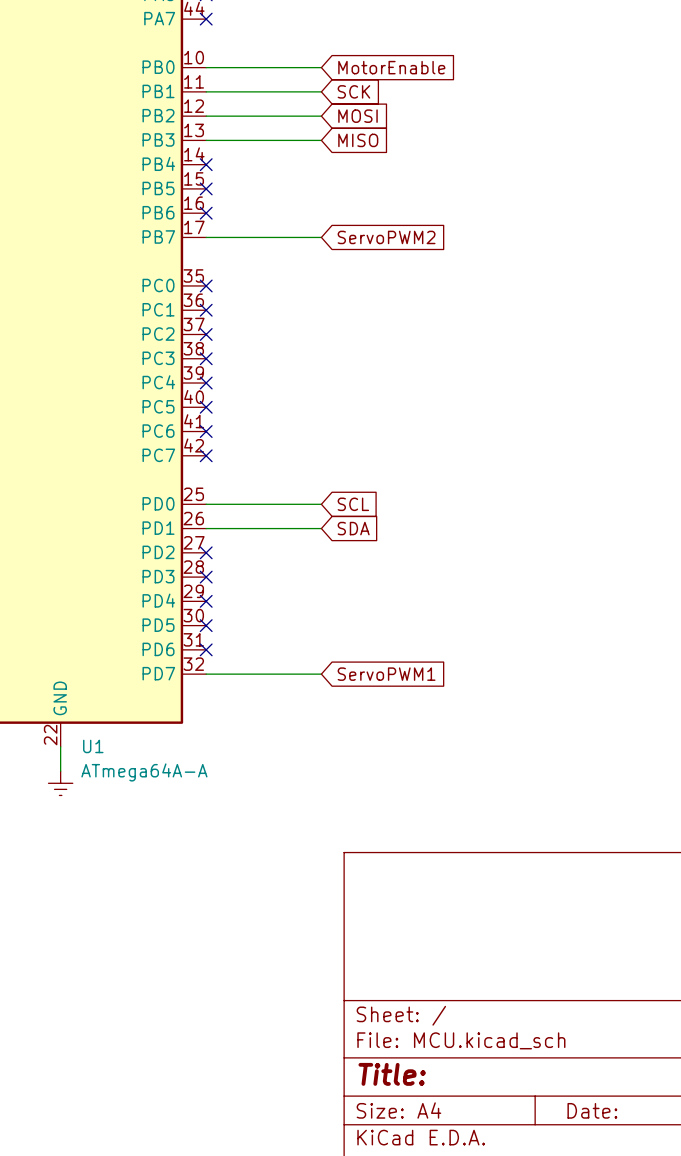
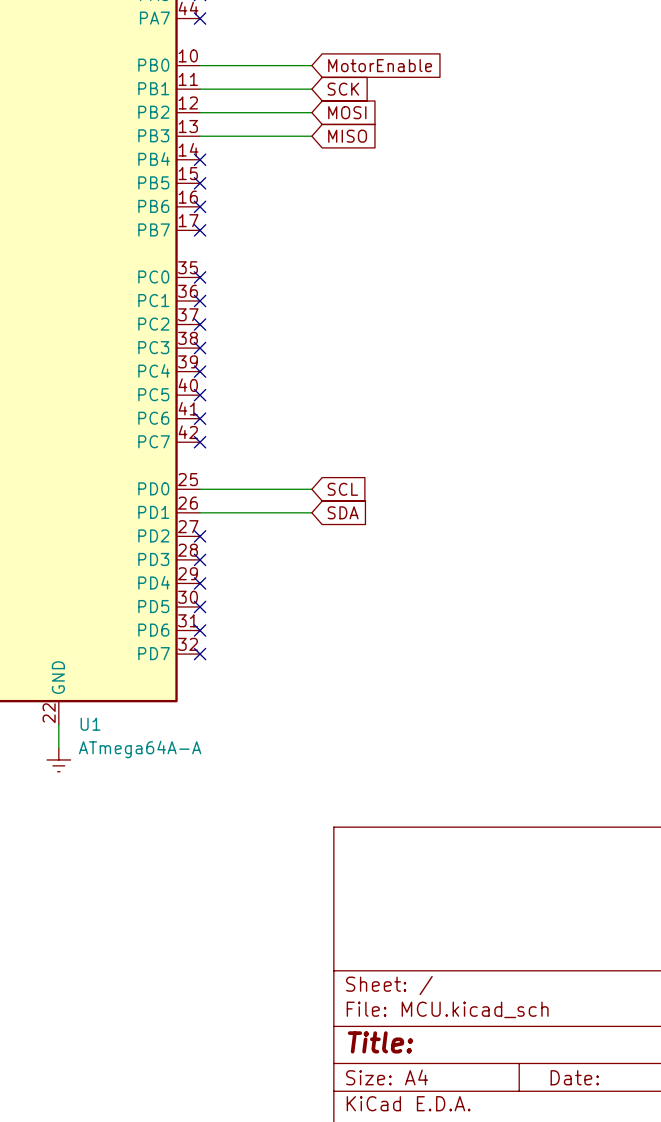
wire: (206, 237) (321, 237) -> none
no-connect mark: none -> (200, 230)
global label: ServoPWM2 (386, 237) -> none
wire: (206, 674) (321, 674) -> none
no-connect mark: none -> (200, 654)
global label: ServoPWM1 (386, 674) -> none

